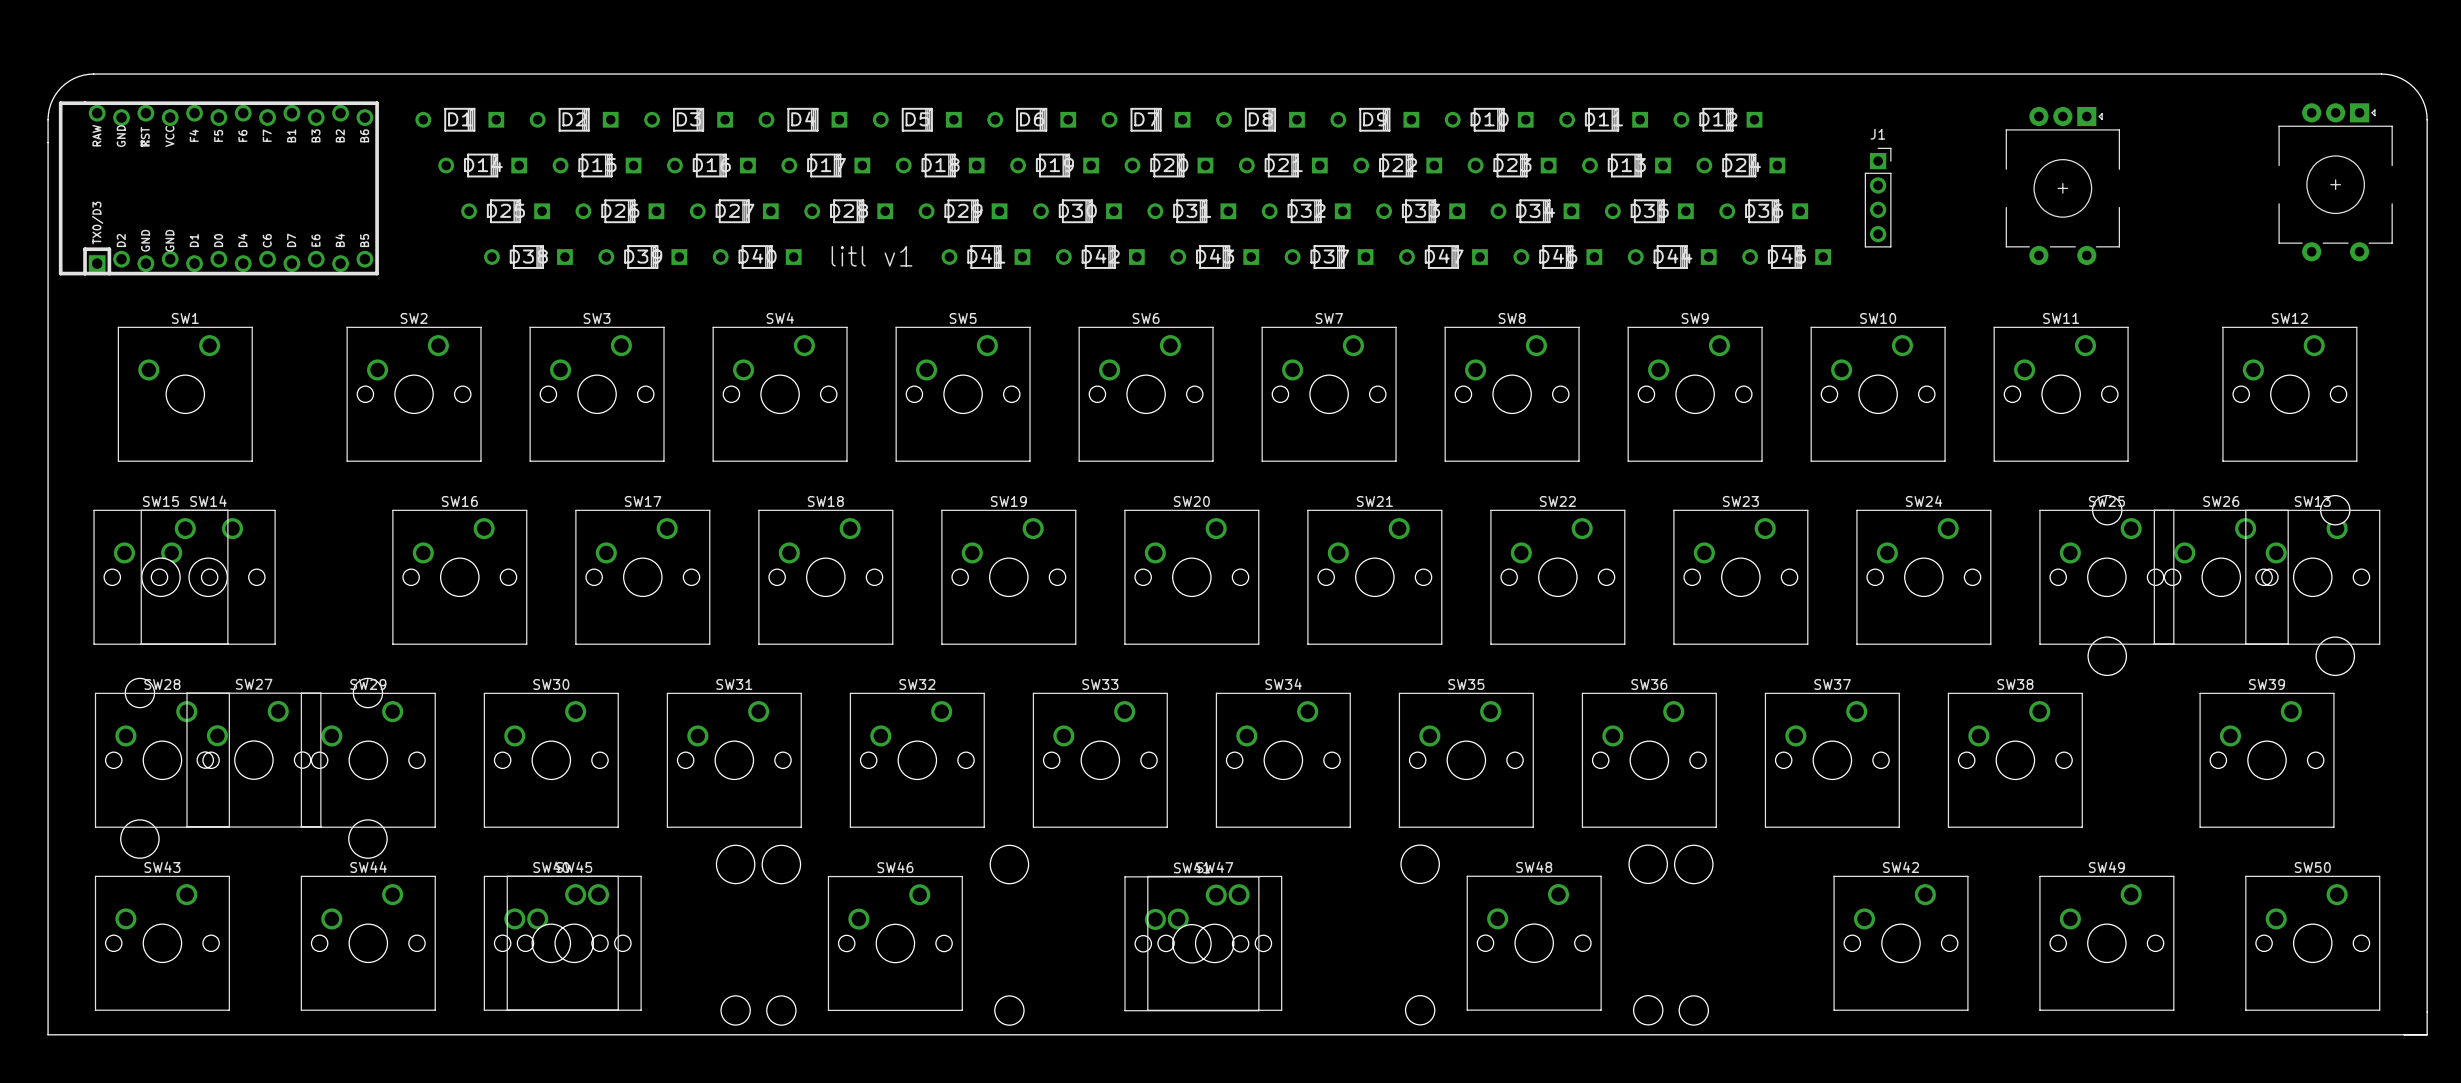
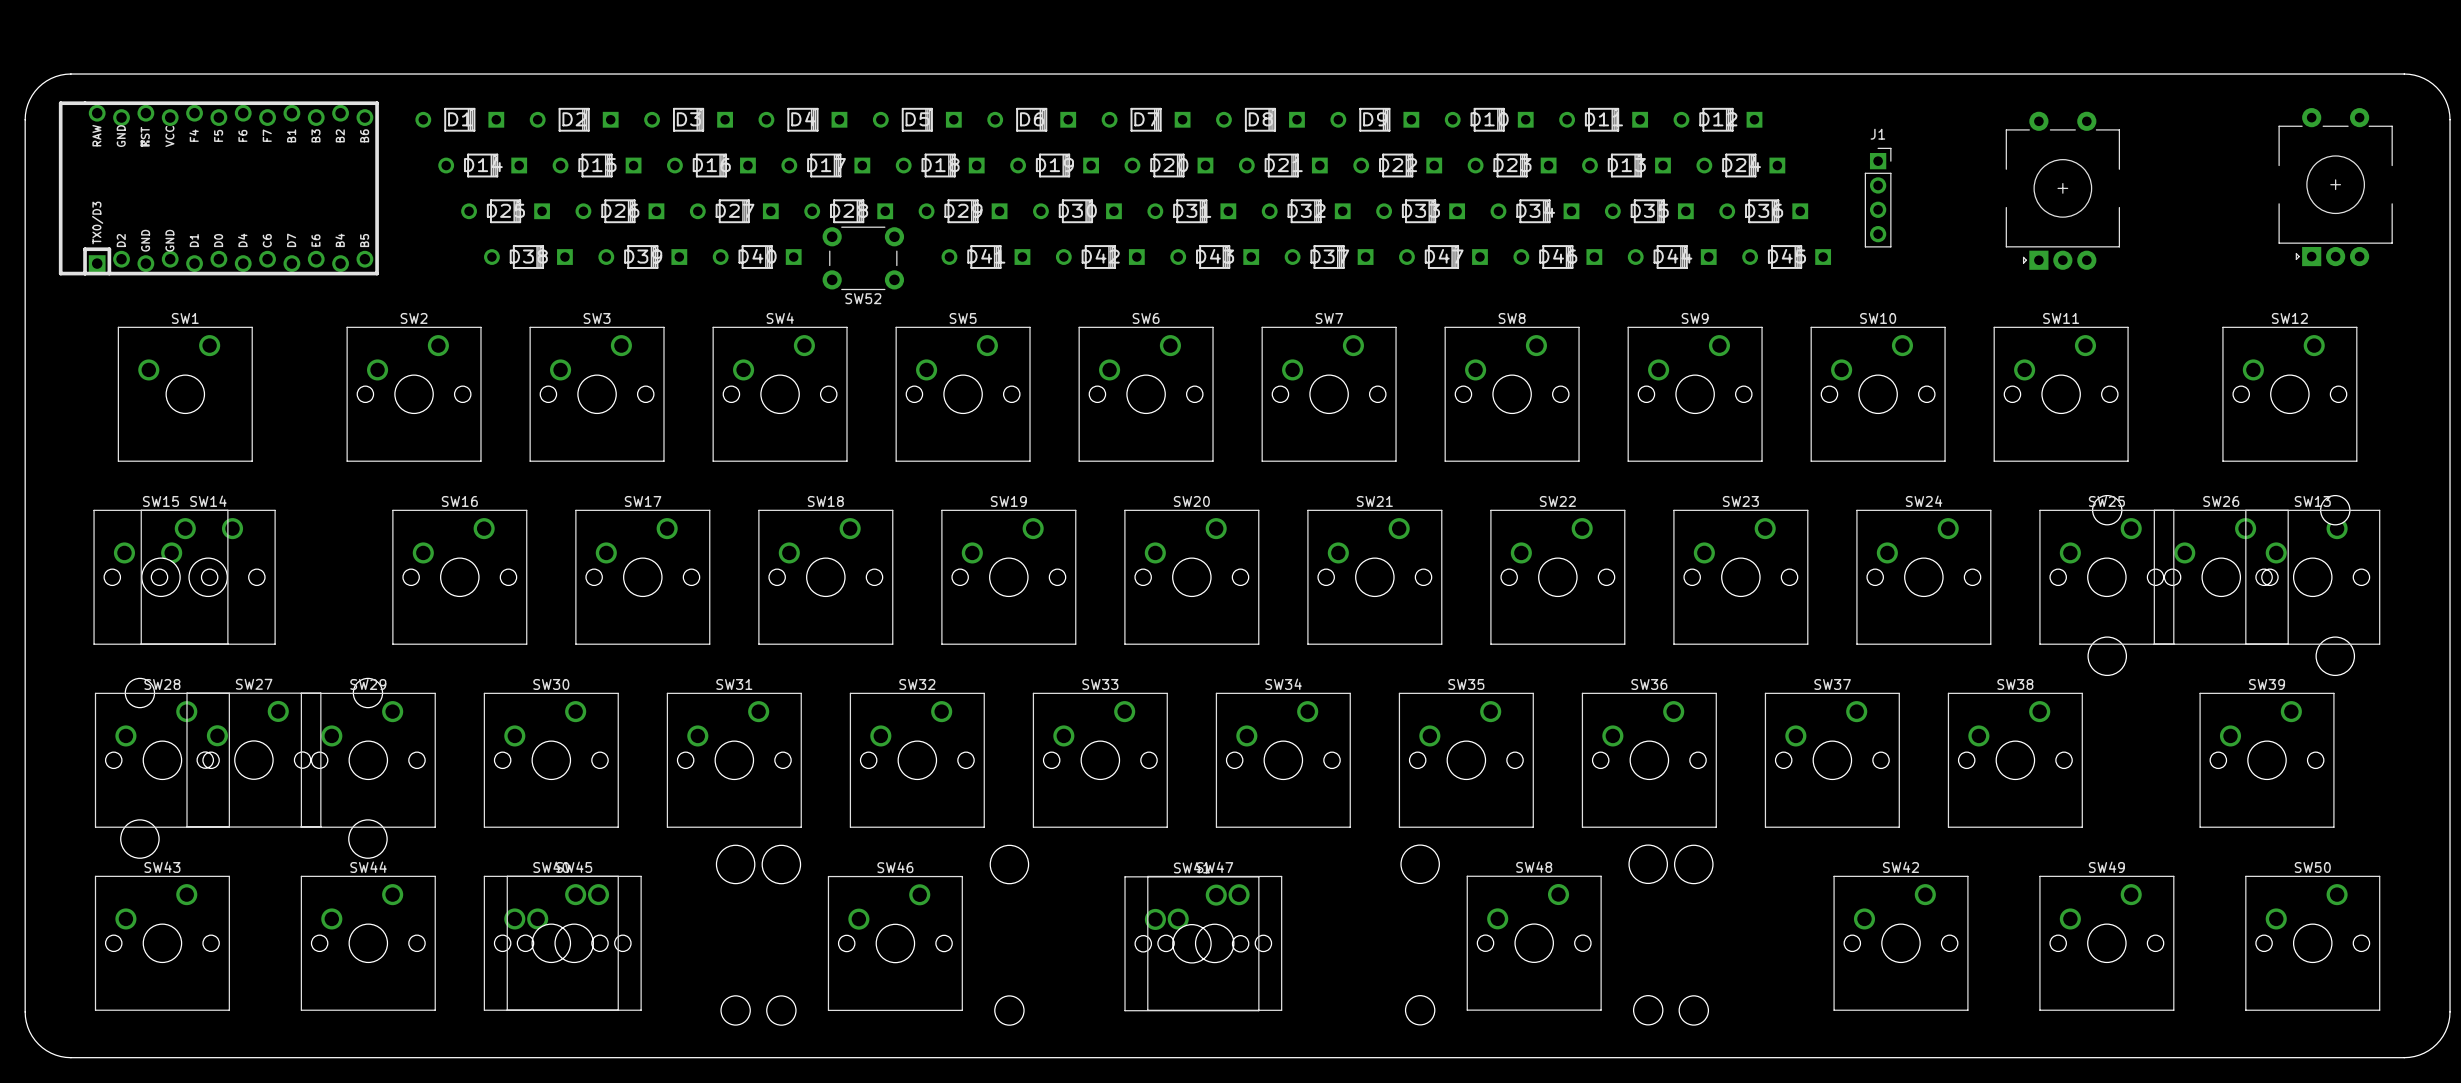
board edge: (93, 74) (73, 78) (61, 87) (52, 99) (48, 119) (48, 1034) (2427, 1034) (2427, 119) (2424, 104) (2413, 87) (2396, 76) (2381, 74) -> (93, 74) (65, 74) (46, 81) (38, 87) (29, 99) (25, 119) (25, 1011) (29, 1031) (38, 1044) (51, 1053) (70, 1057) (2404, 1057) (2424, 1053) (2436, 1044) (2443, 1036) (2448, 1022) (2450, 1011) (2450, 119) (2445, 99) (2436, 87) (2428, 81) (2409, 74) (2381, 74)
part rotation: 0° (2335, 182) -> 180° (2335, 187)
part rotation: 0° (2062, 185) -> 180° (2062, 190)
text: litl v1 (872, 256) -> none
SW52: none -> (863, 258)

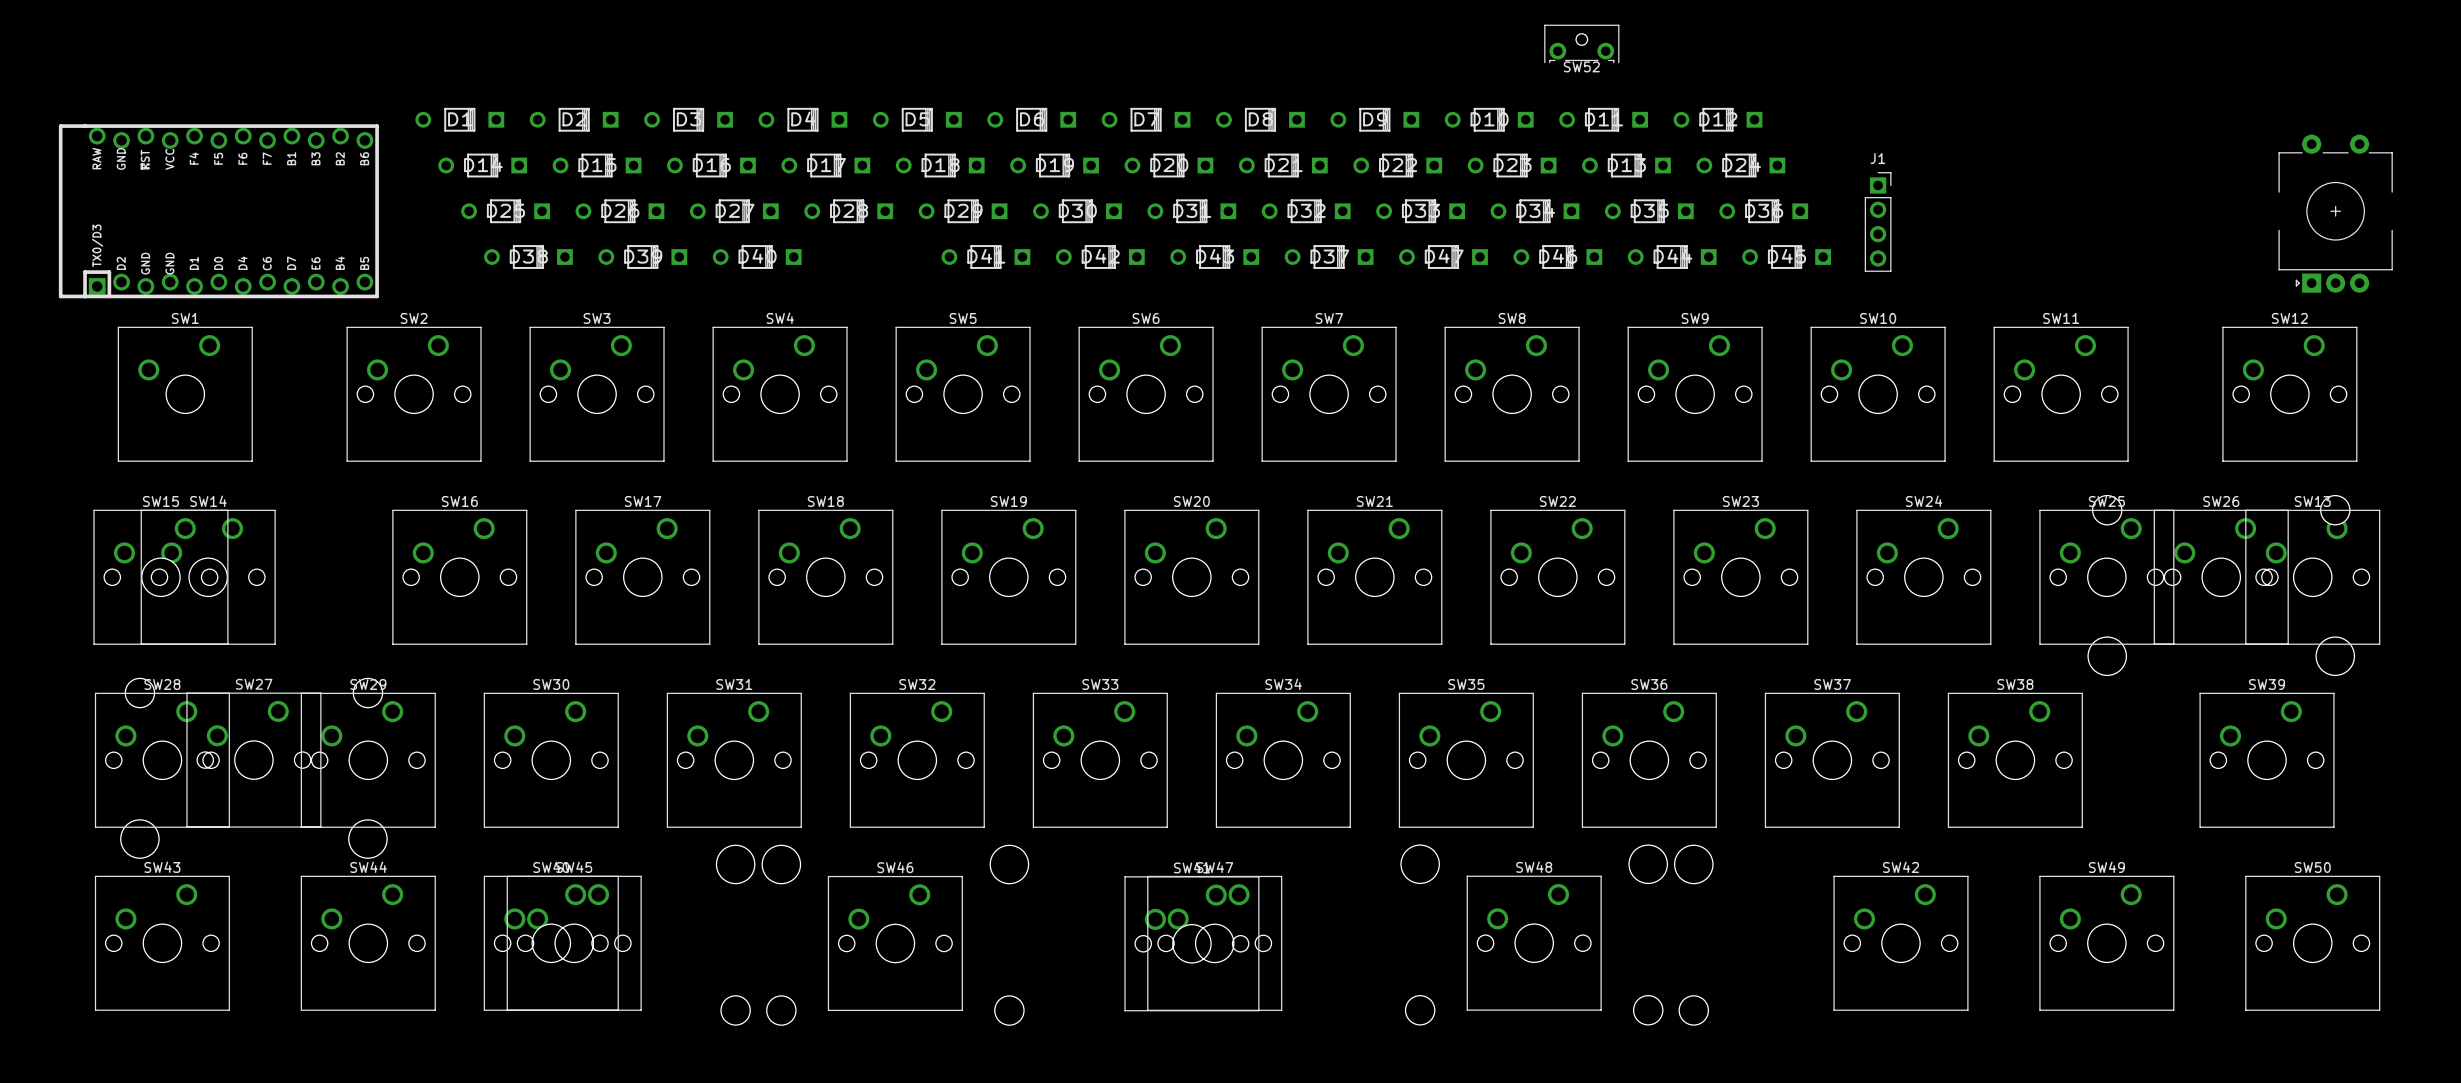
board edge: (70, 74) (2404, 74) (2419, 76) (2432, 83) (2443, 95) (2448, 109) (2450, 119) (2450, 1011) (2447, 1027) (2440, 1040) (2428, 1050) (2419, 1055) (2404, 1057) (70, 1057) (55, 1055) (42, 1047) (35, 1040) (27, 1027) (25, 1011) (25, 119) (27, 104) (38, 87) (55, 76) (70, 74) -> none
part position: (2335, 187) -> (2335, 213)
part position: (218, 188) -> (218, 211)
part: (2062, 190) -> none
J1 position: (1878, 197) -> (1878, 221)
SW52 footprint: [822, 226, 905, 291] -> [1544, 24, 1620, 64]

